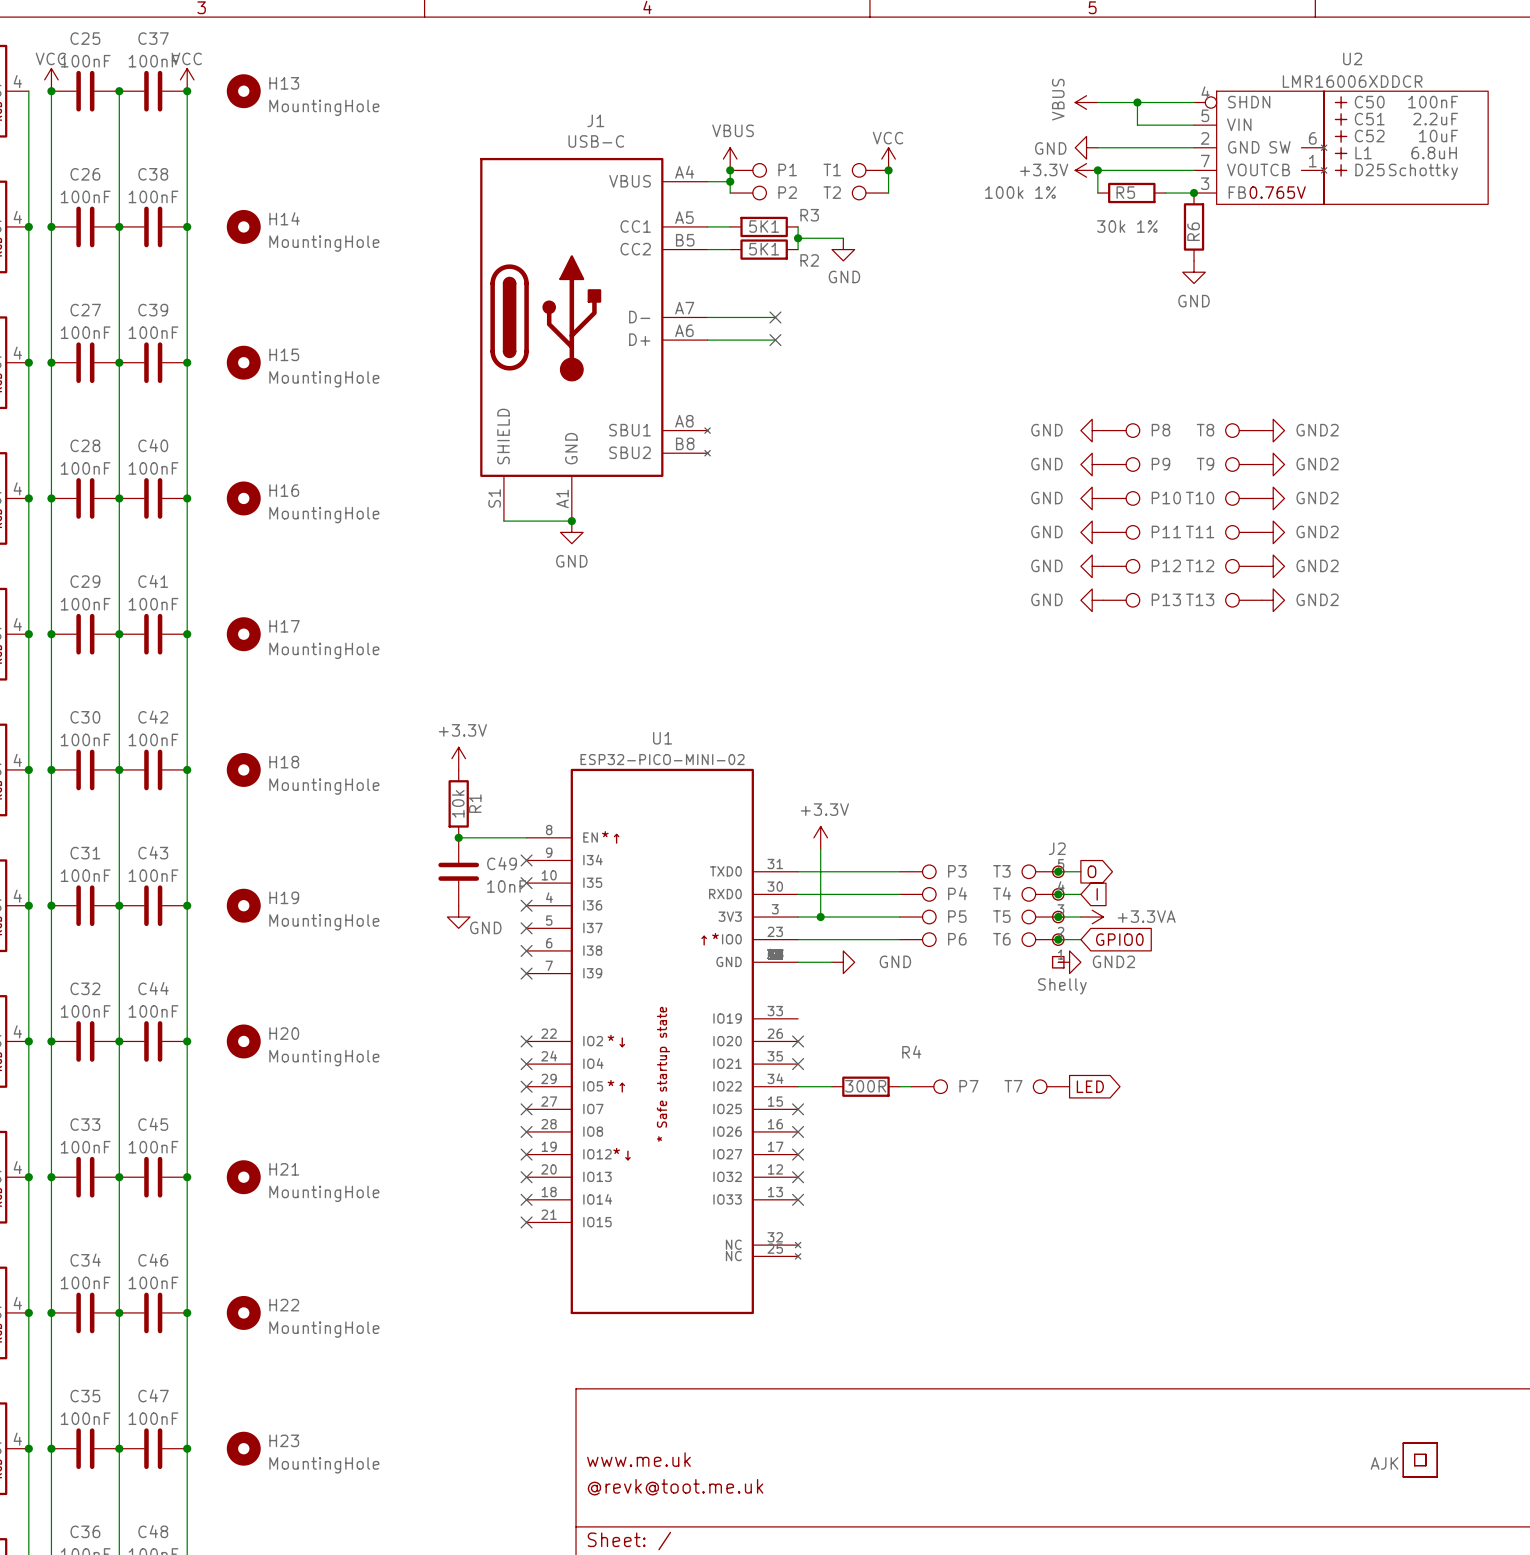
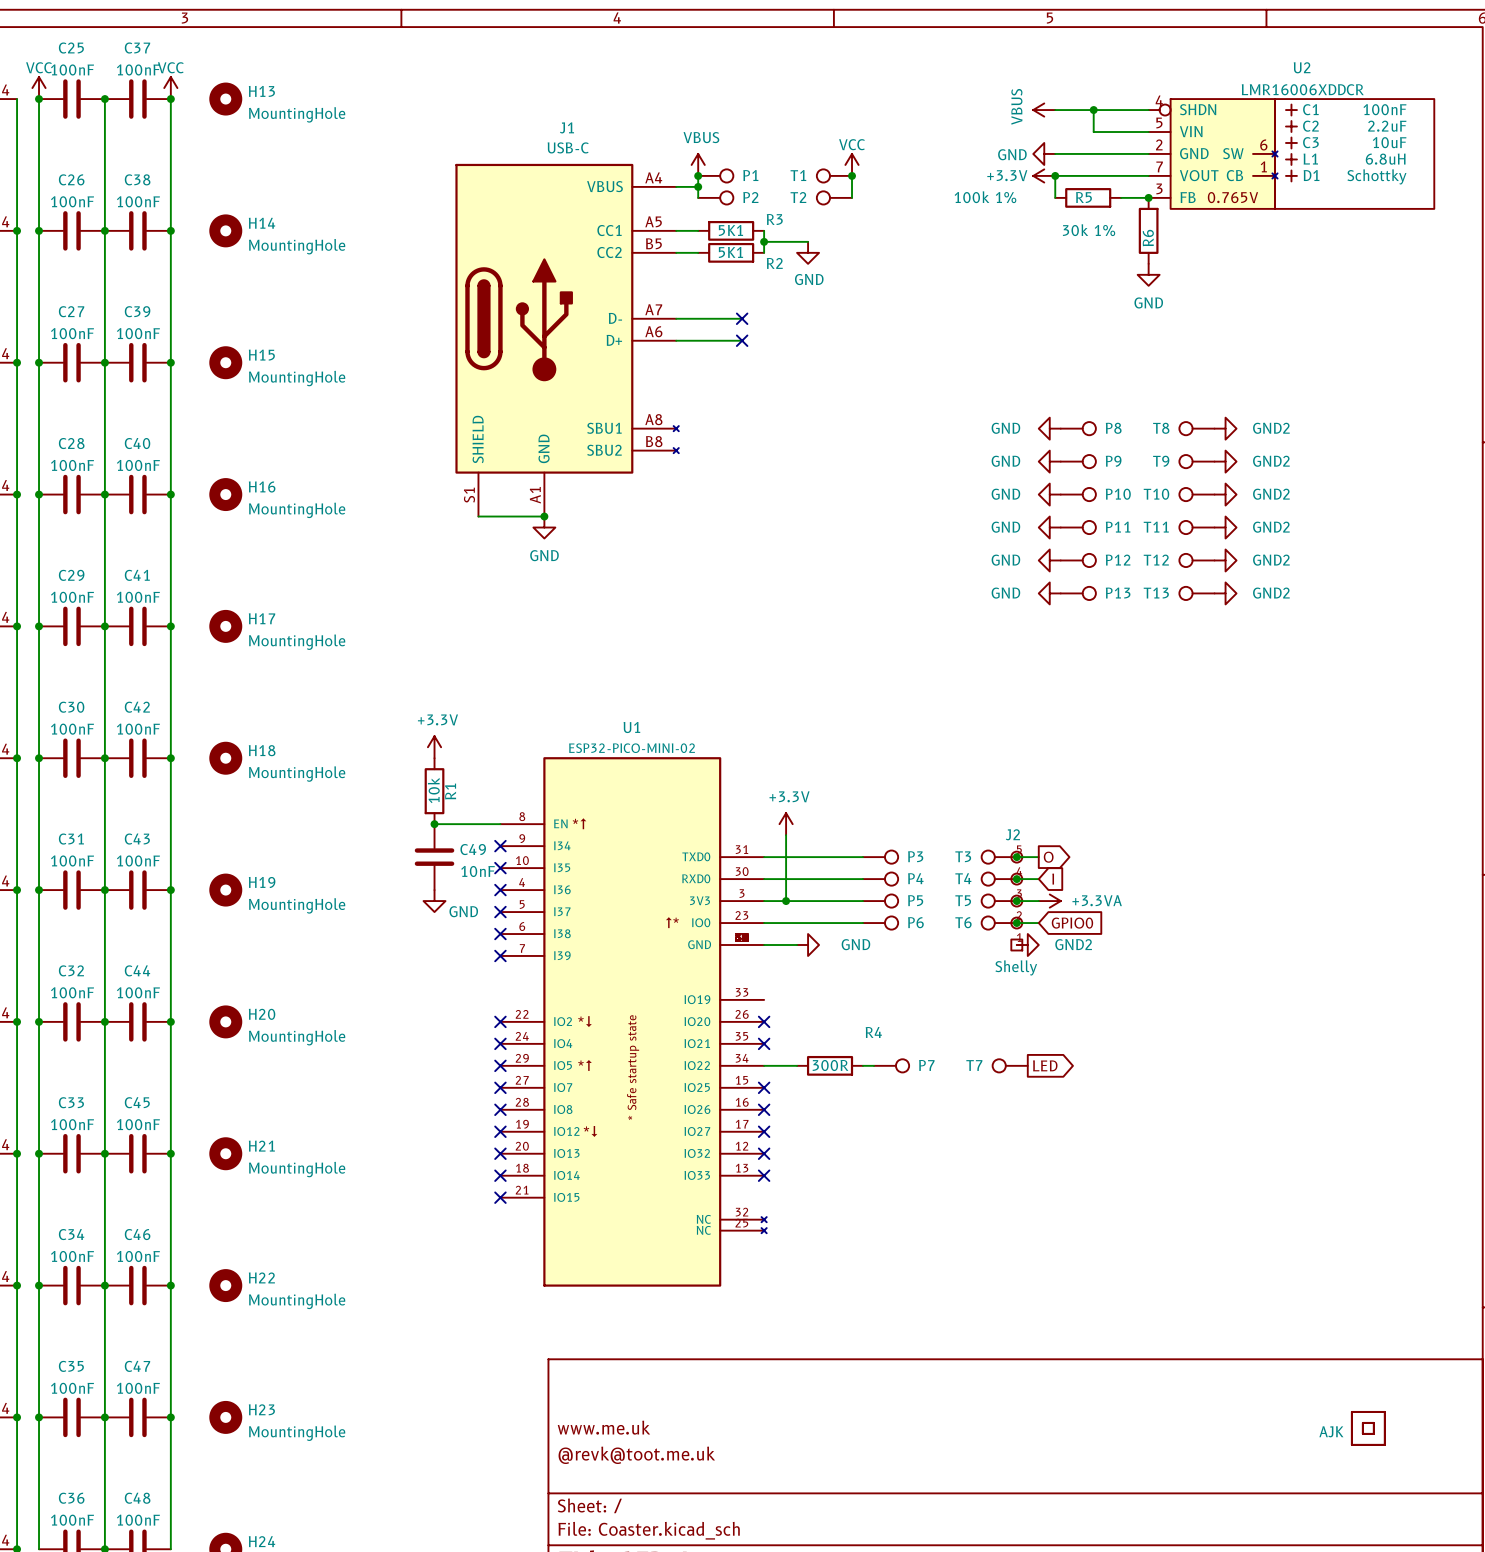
C50 name: C50 (1369, 102) -> C1 (1310, 109)
C51 name: C51 (1369, 119) -> C2 (1310, 126)
C52 name: C52 (1369, 136) -> C3 (1310, 142)
D25 name: D25 (1369, 169) -> D1 (1311, 175)

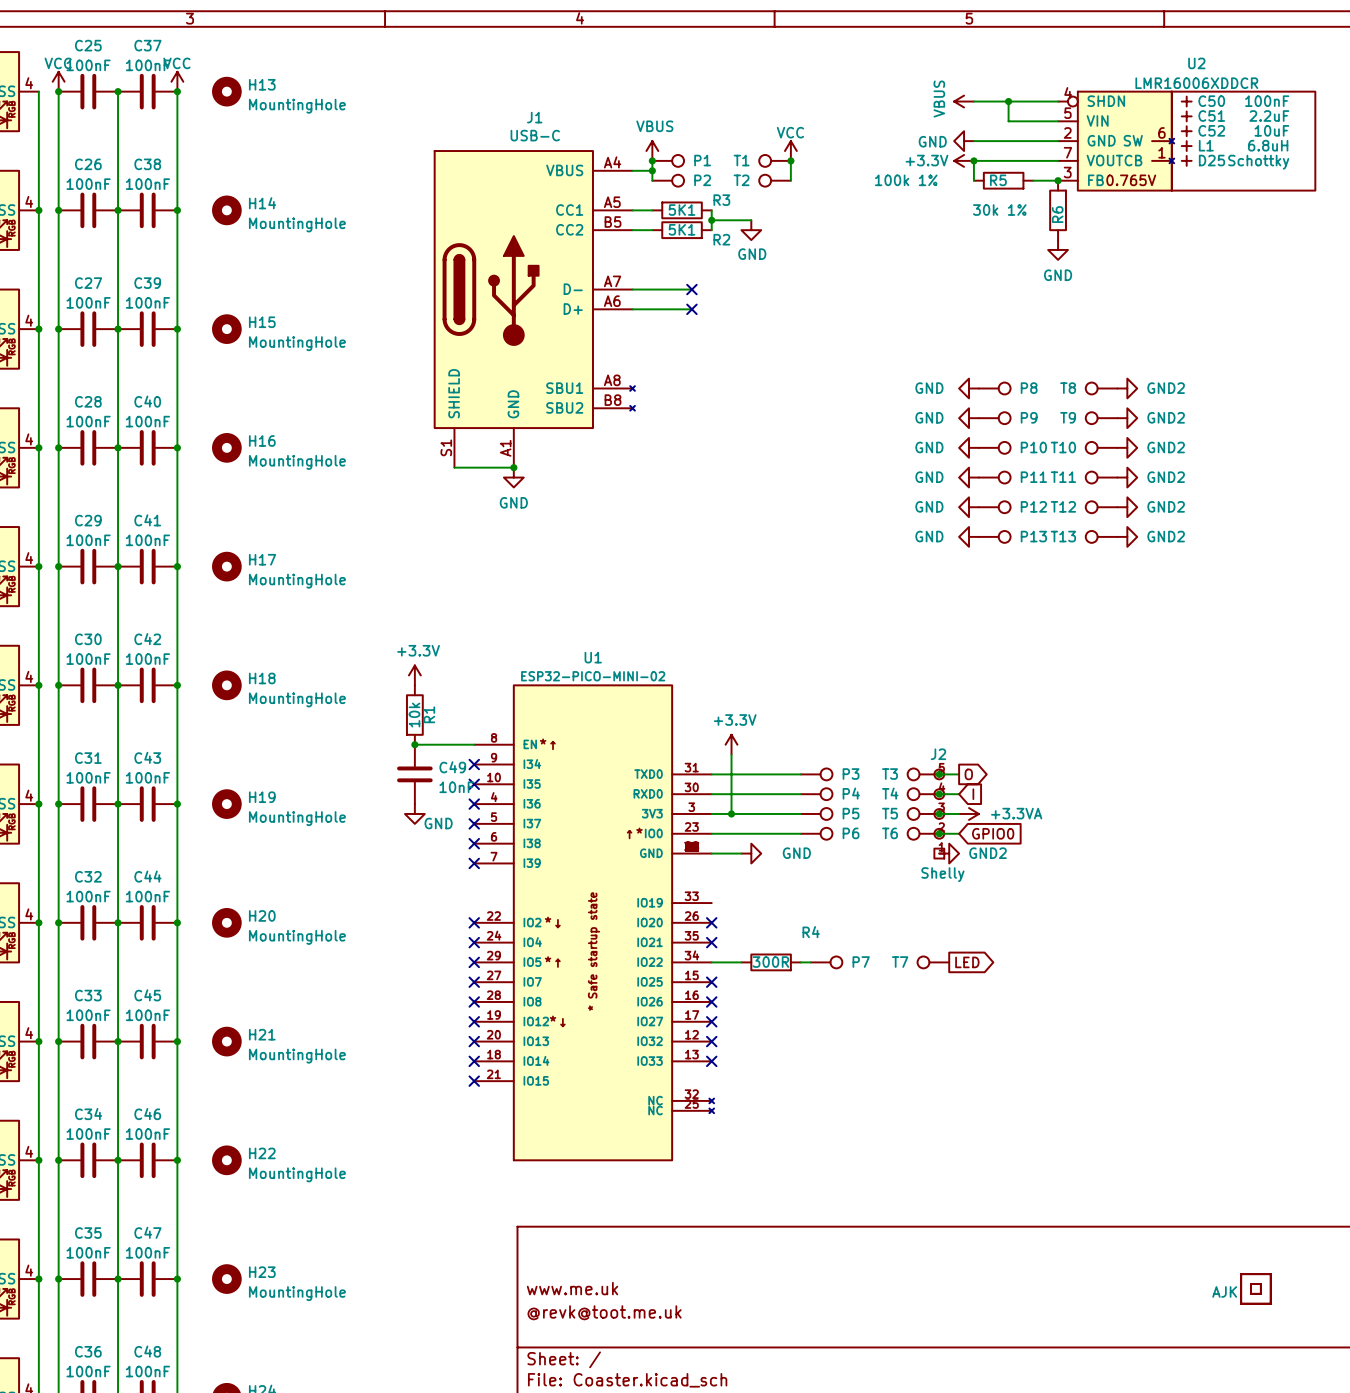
C1 name: C1 (1310, 109) -> C50 (1211, 101)
C2 name: C2 (1310, 126) -> C51 (1211, 116)
C3 name: C3 (1310, 142) -> C52 (1211, 130)
D1 name: D1 (1311, 175) -> D25 (1211, 160)

